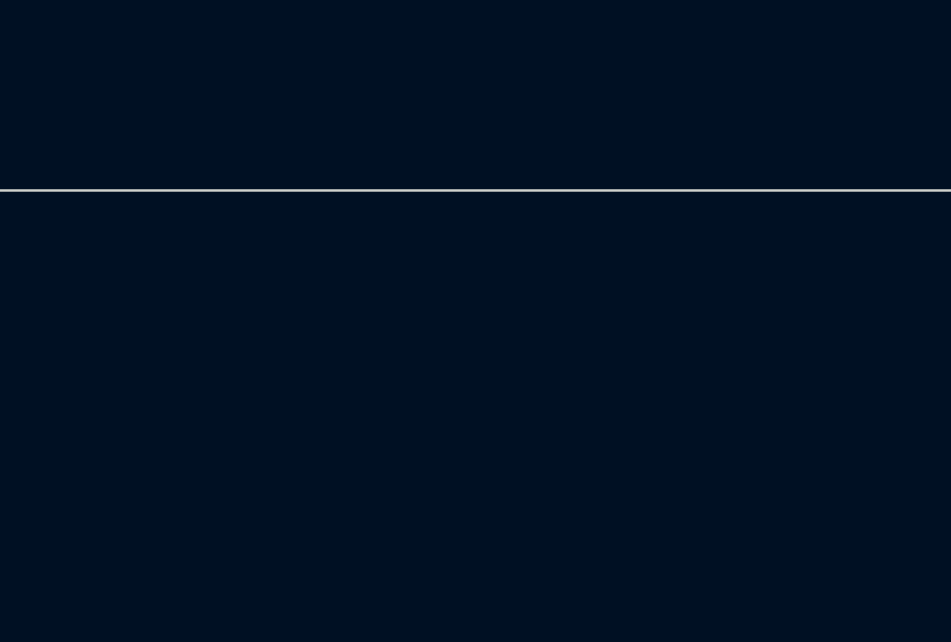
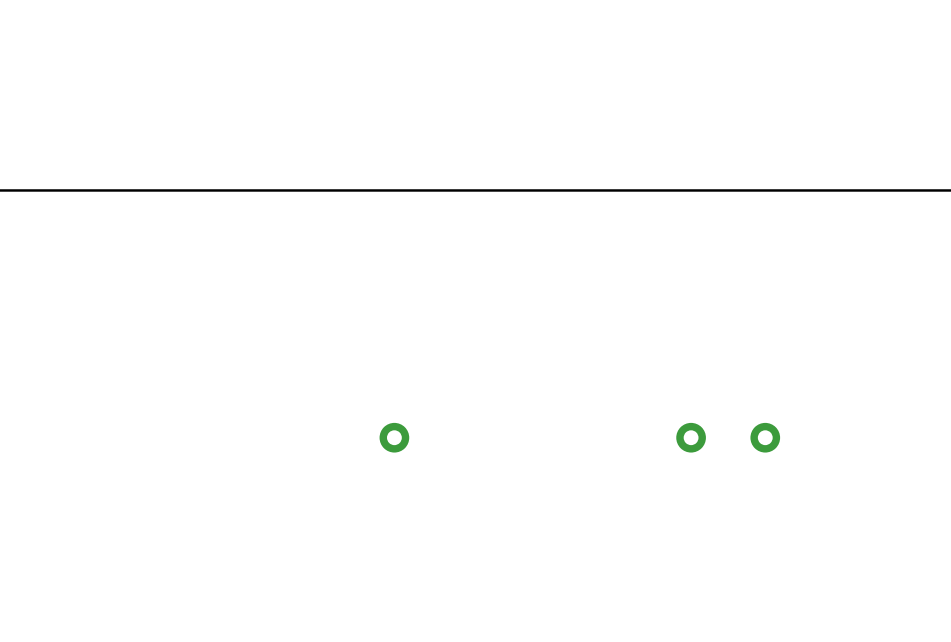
via: none -> (394, 437)
via: none -> (691, 437)
via: none -> (765, 437)

